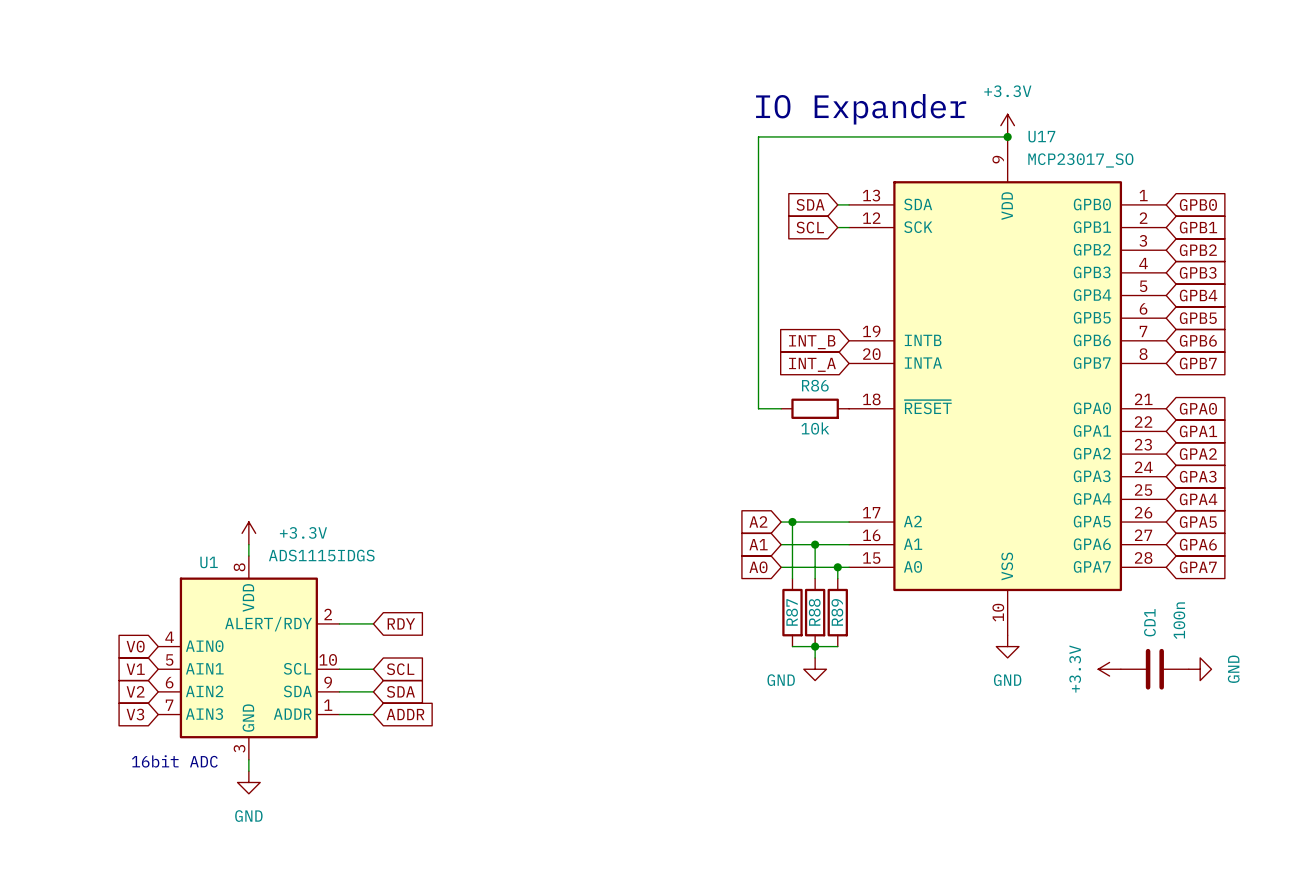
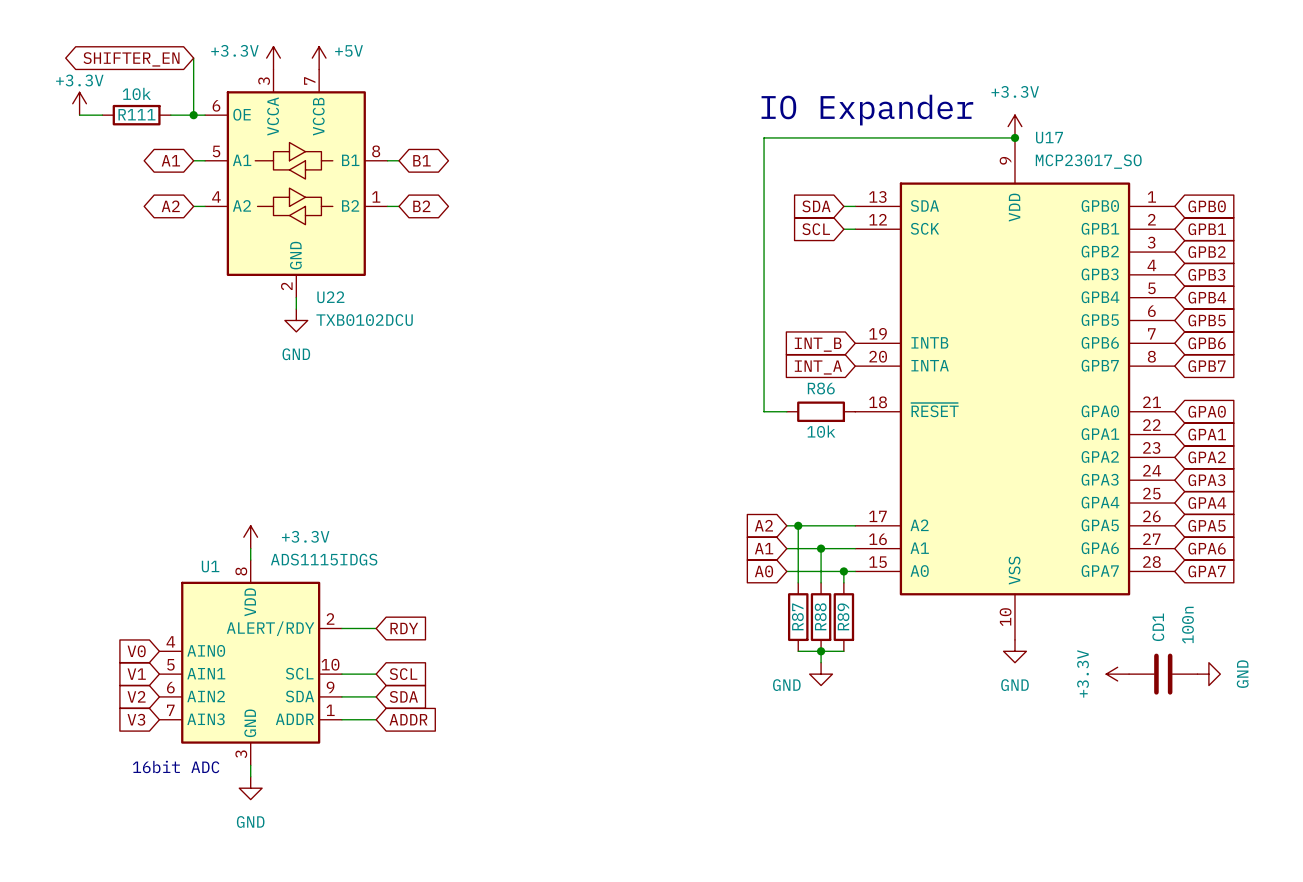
wire: none -> (193, 58) (193, 115)
power symbol: none -> +3.3V (273, 58)
power symbol: none -> +5V (319, 58)
global label: none -> SHIFTER_EN (131, 59)
power symbol: none -> +3.3V (79, 103)
wire: none -> (79, 115) (102, 115)
R111: none -> 10k (136, 115)
wire: none -> (170, 115) (205, 115)
junction: none -> (193, 115)
global label: none -> A1 (170, 160)
wire: none -> (193, 160) (205, 160)
wire: none -> (387, 160) (398, 160)
global label: none -> B1 (421, 160)
U22: none -> TXB0102DCU (296, 183)
global label: none -> A2 (170, 206)
wire: none -> (193, 206) (205, 206)
wire: none -> (387, 206) (398, 206)
global label: none -> B2 (421, 206)
wire: none -> (296, 297) (296, 309)
power symbol: none -> GND (296, 320)

